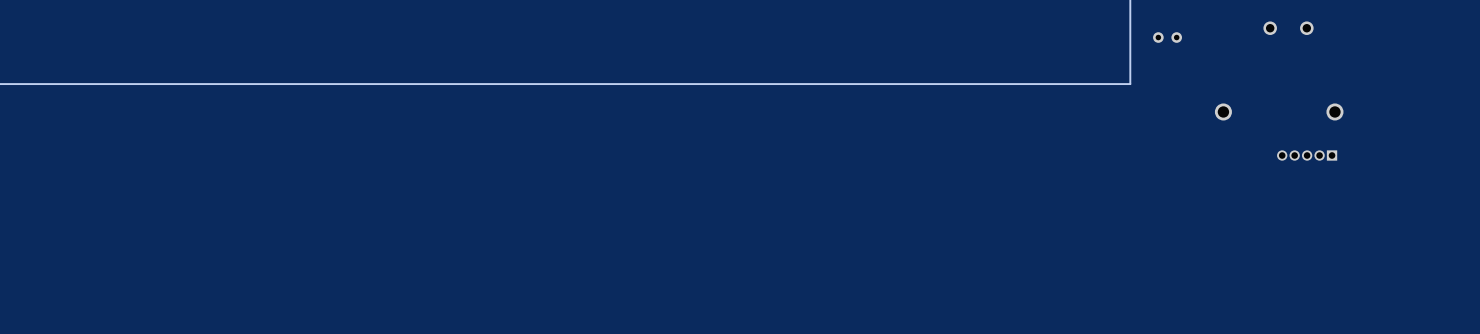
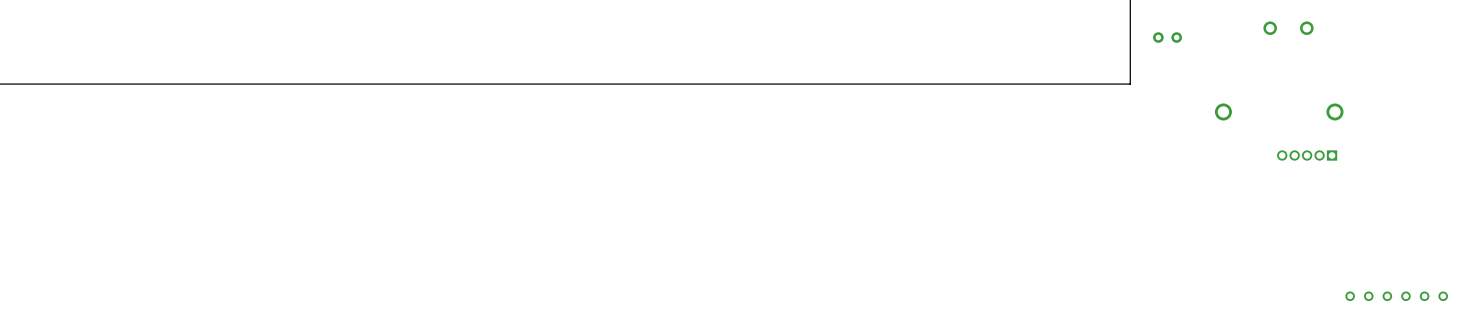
part: none -> (1396, 296)

